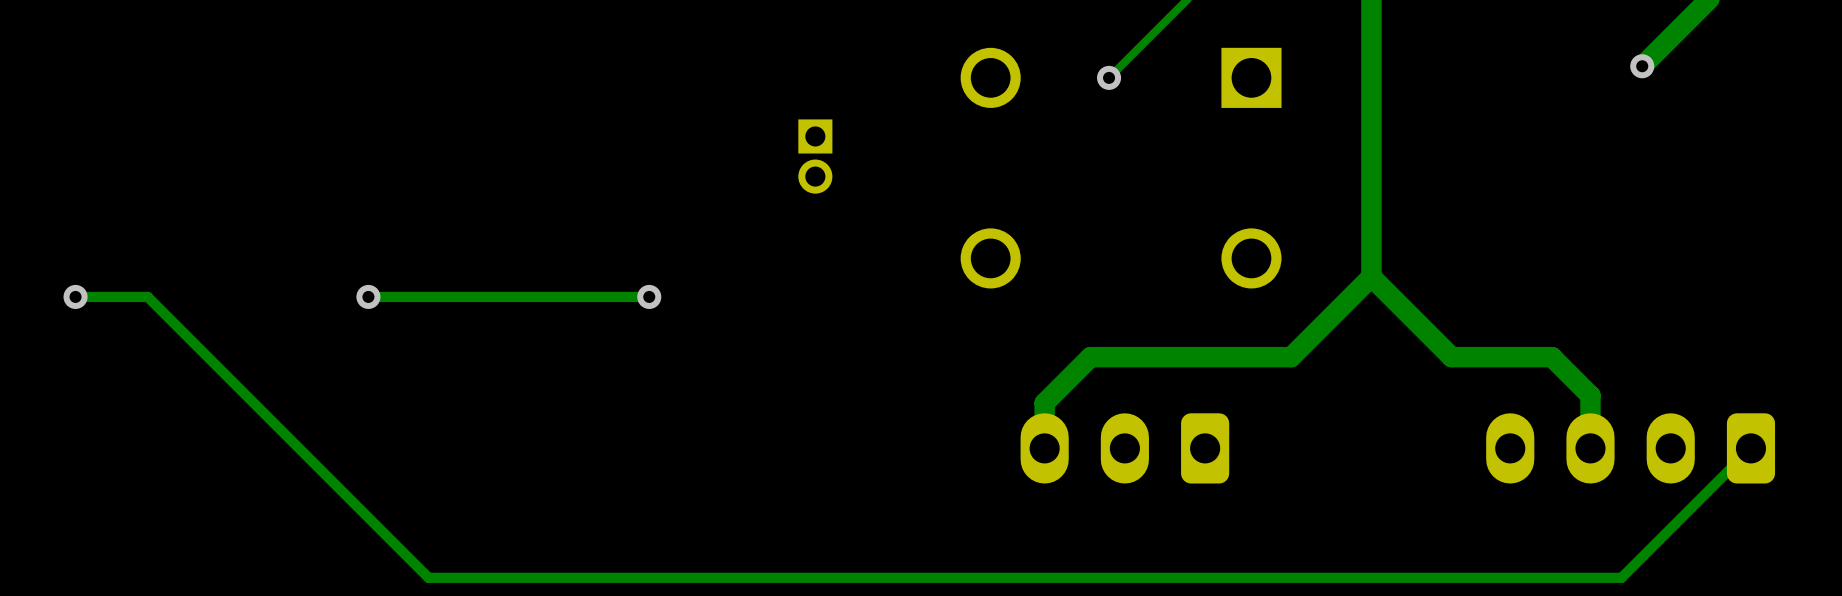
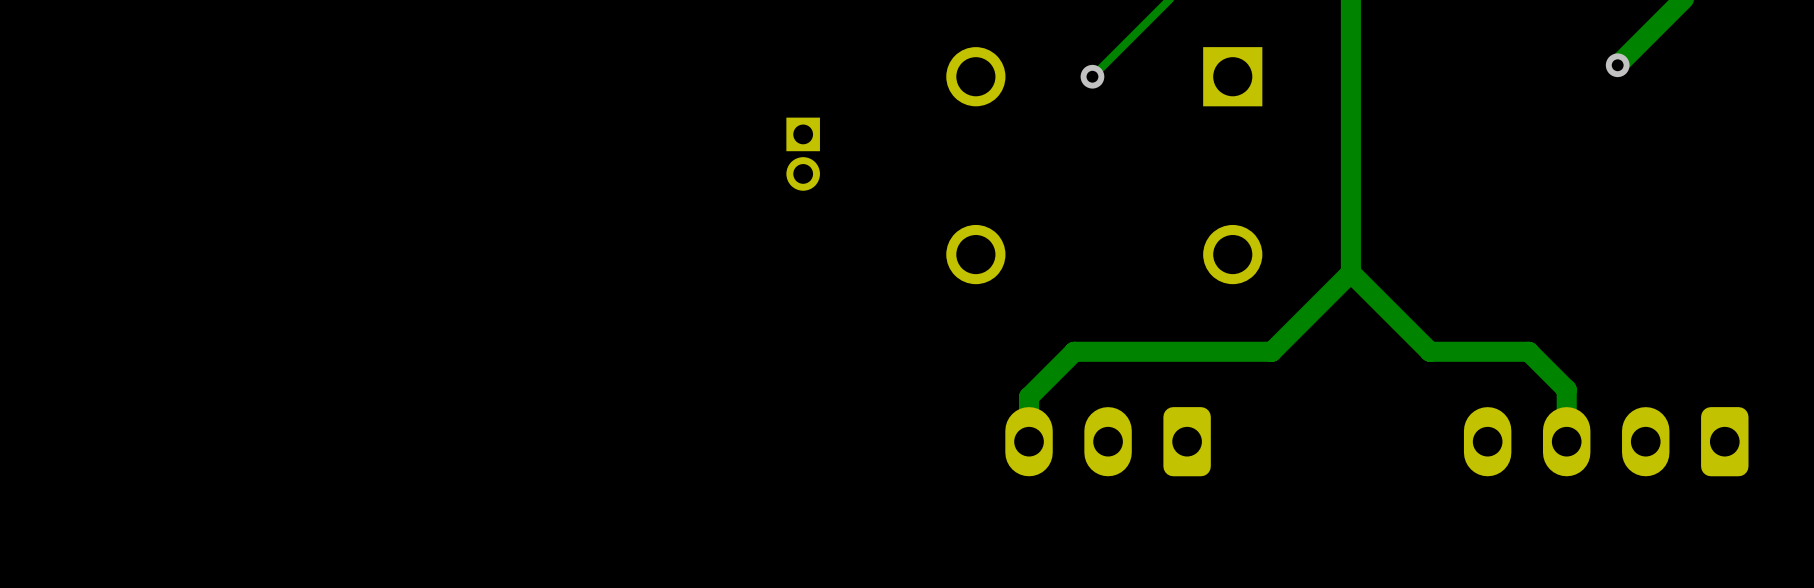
track: (75, 296) (147, 296) (428, 577) (1621, 577) (1750, 448) -> none
via: (75, 296) -> none
via: (368, 296) -> none
track: (649, 296) (368, 296) -> none
via: (649, 296) -> none

